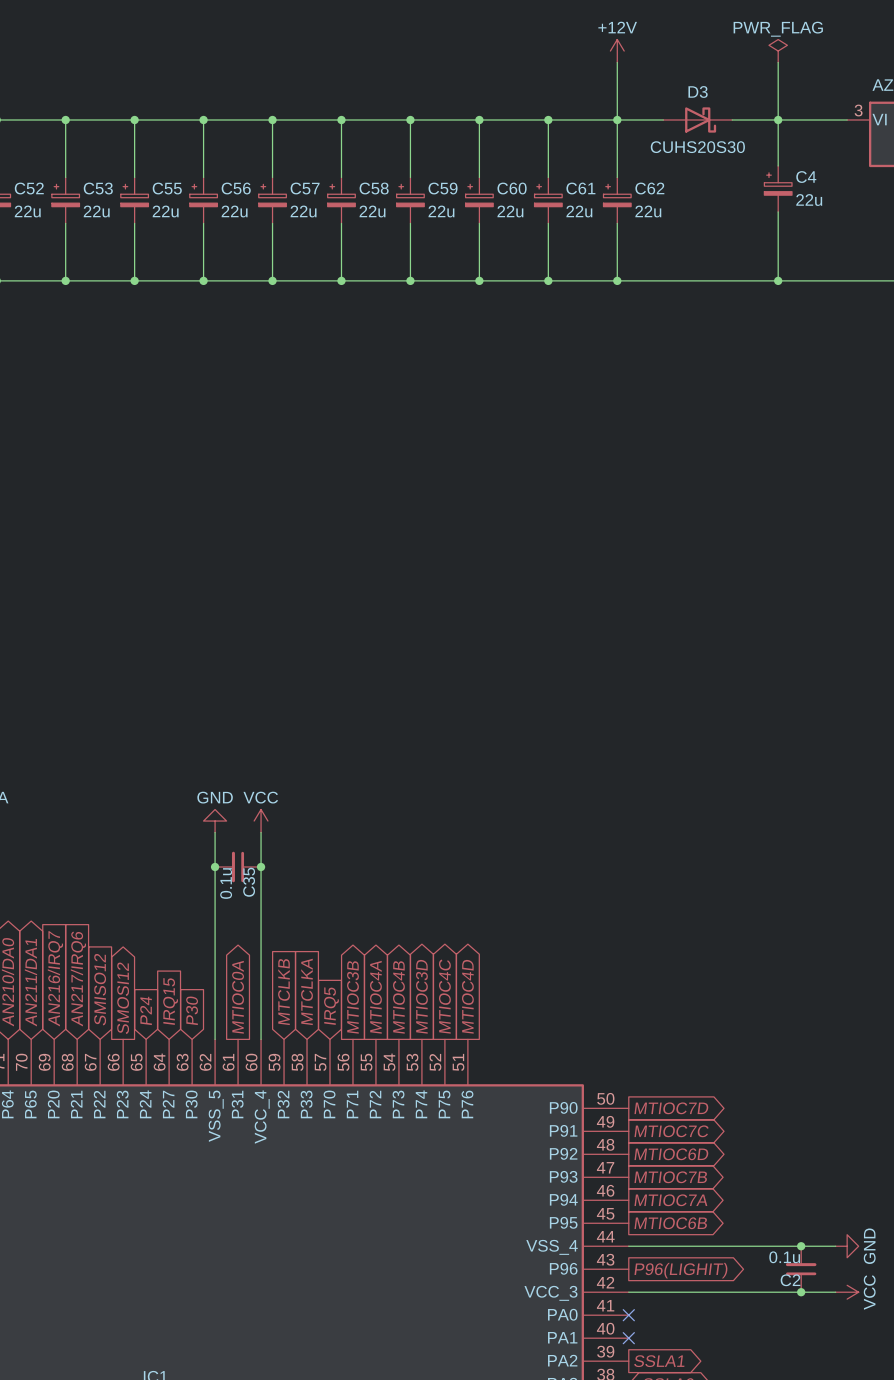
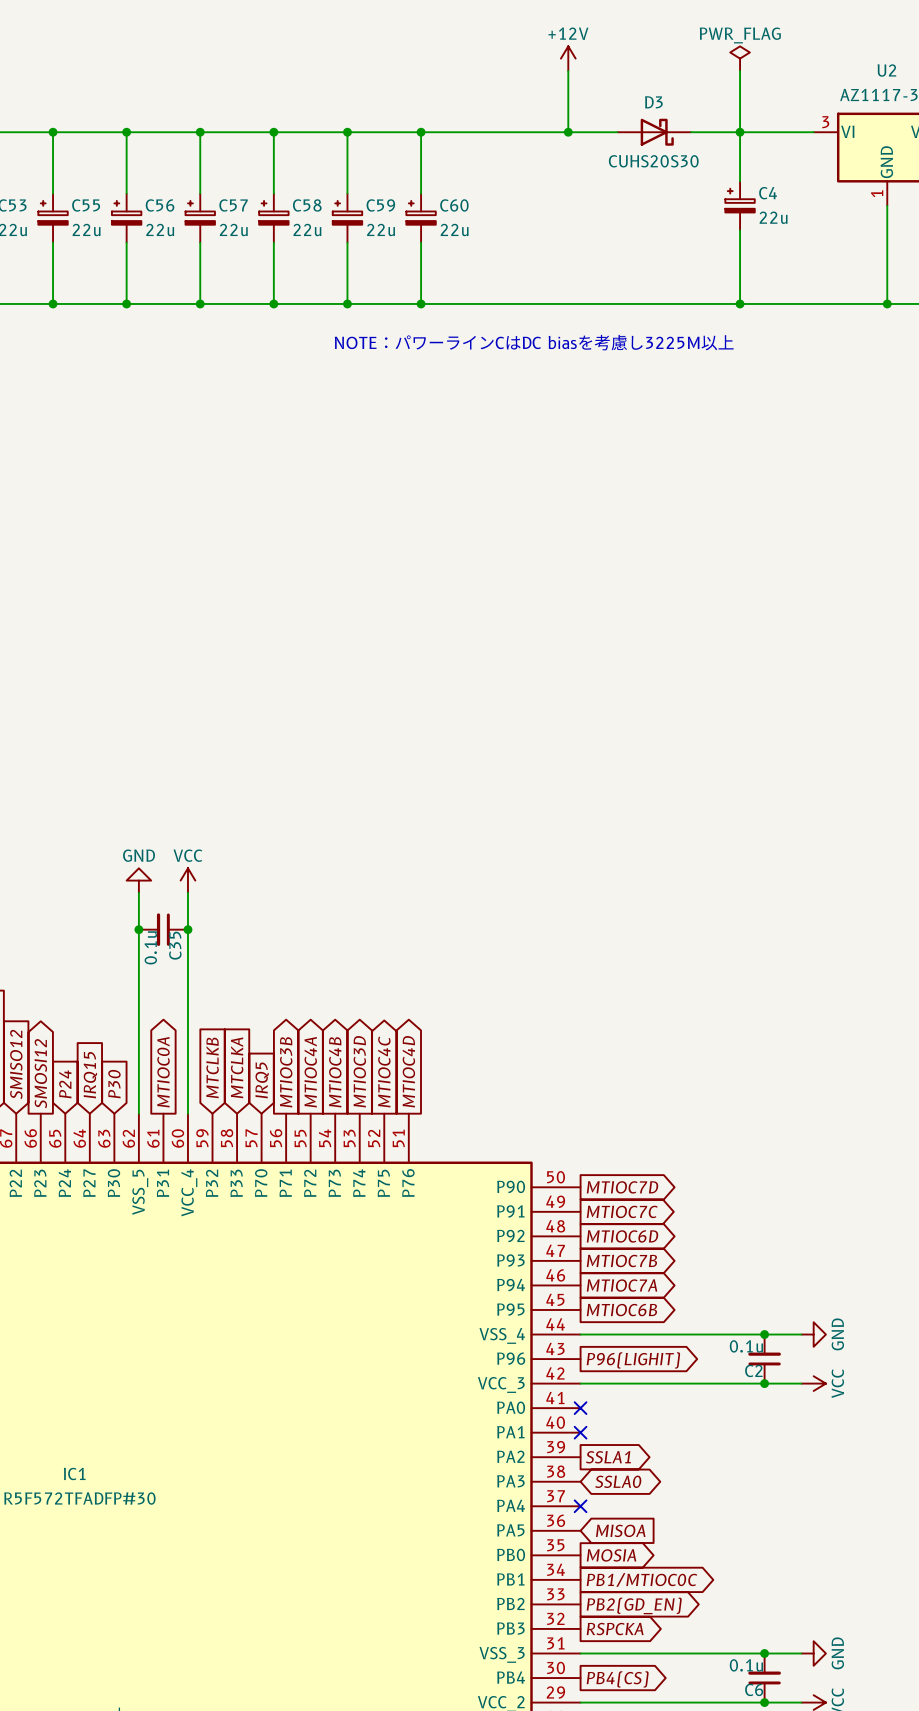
wire: (548, 120) (548, 177) -> none
junction: (548, 120) -> none
wire: (617, 120) (617, 177) -> none
C61: 22u (548, 200) -> none
C62: 22u (617, 200) -> none
wire: (548, 223) (548, 280) -> none
wire: (617, 223) (617, 280) -> none
junction: (548, 280) -> none
junction: (617, 280) -> none
text: none -> NOTE：パワーラインCはDC biasを考慮し3225M以上 (534, 342)

